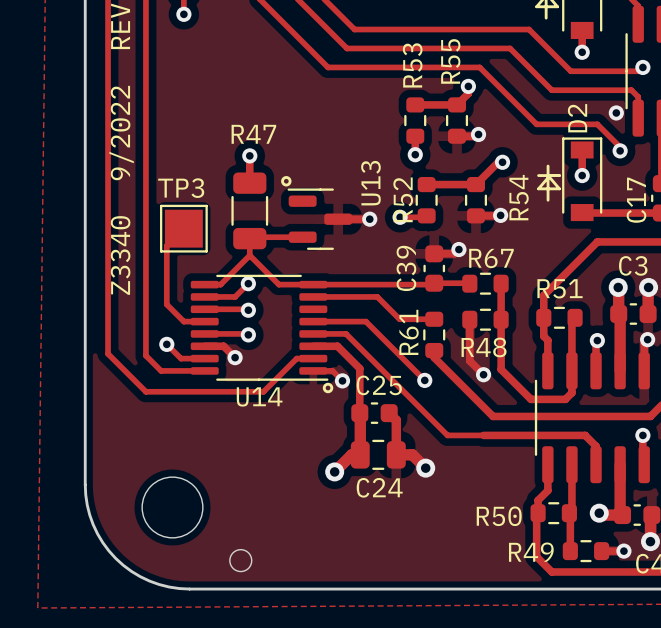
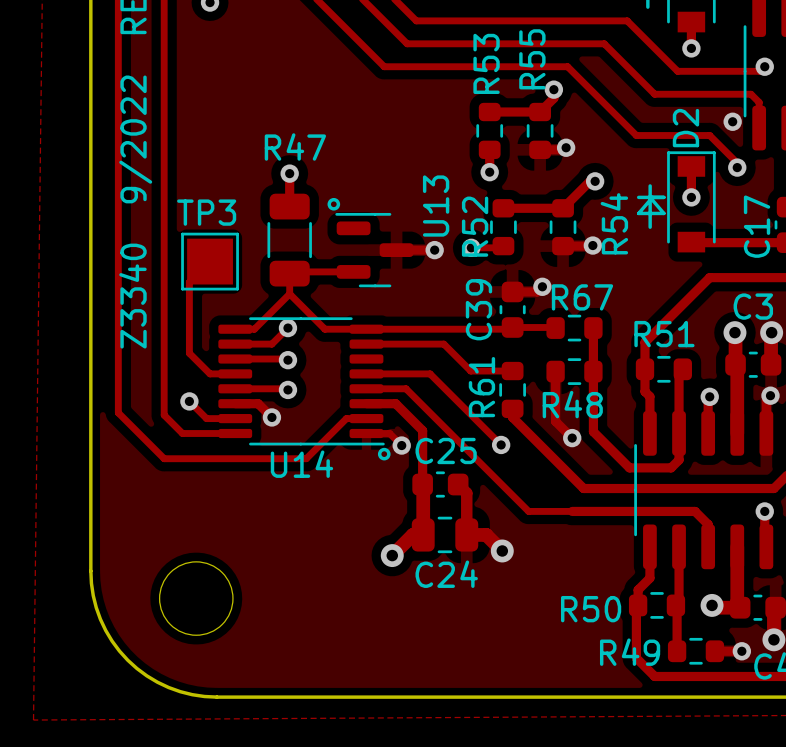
round board edge: [229, 549, 253, 573] -> none

